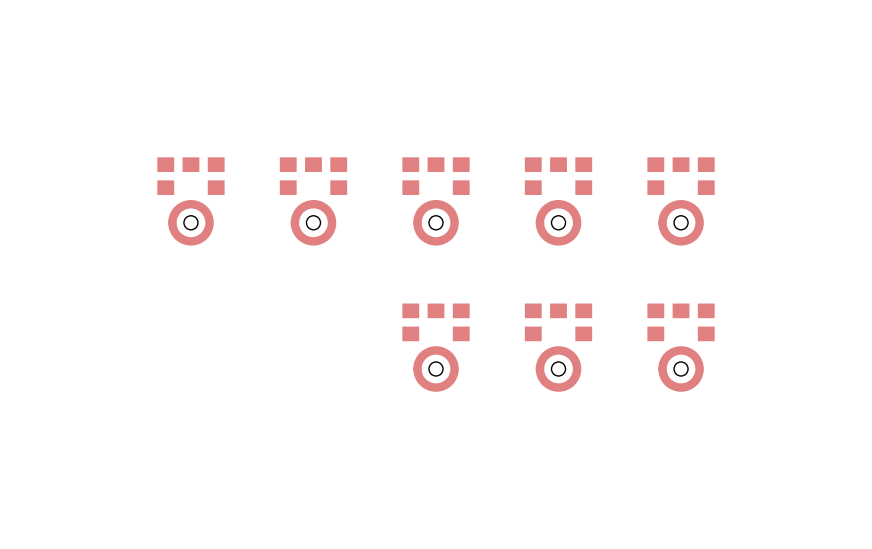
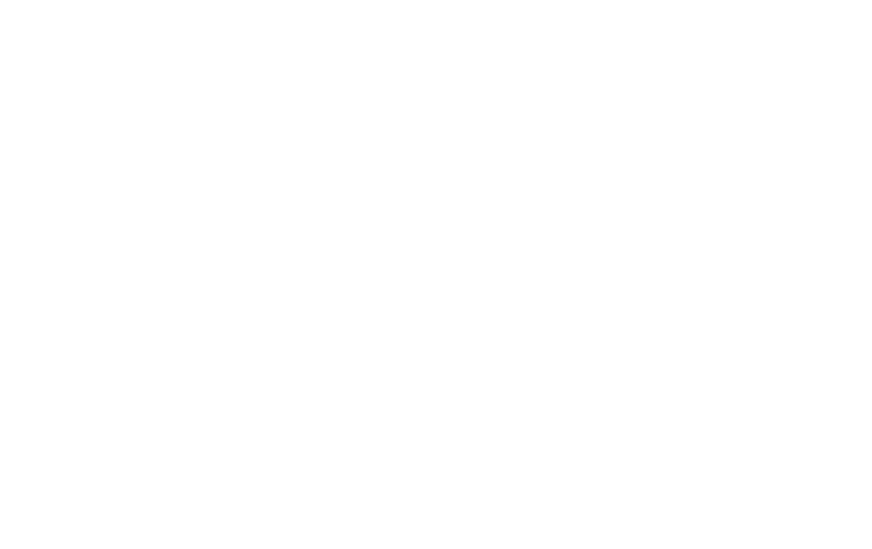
part: (190, 201) -> none
part: (313, 201) -> none
part: (436, 201) -> none
part: (558, 201) -> none
part: (681, 201) -> none
part: (436, 347) -> none
part: (558, 347) -> none
part: (681, 347) -> none

